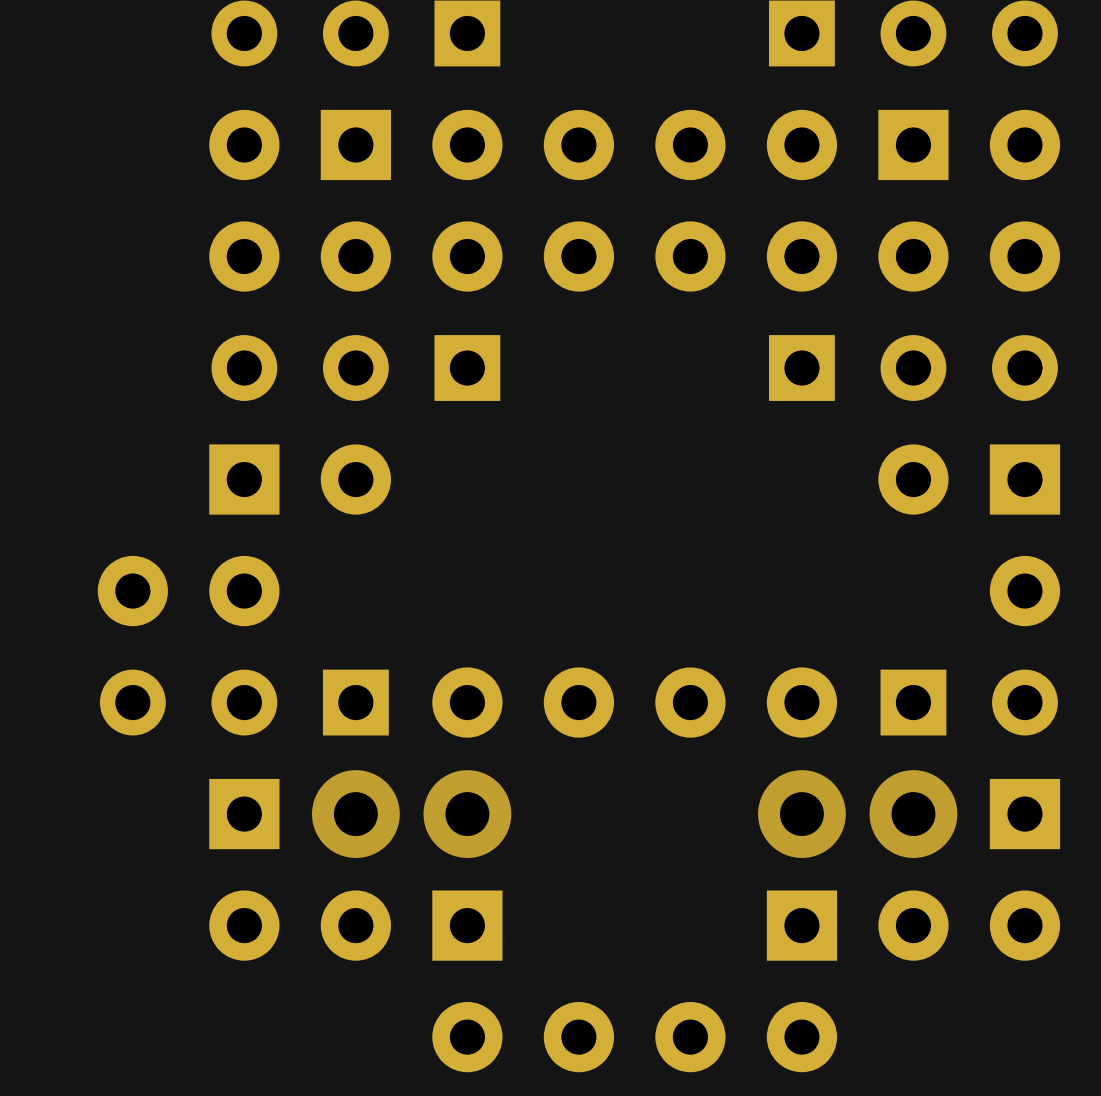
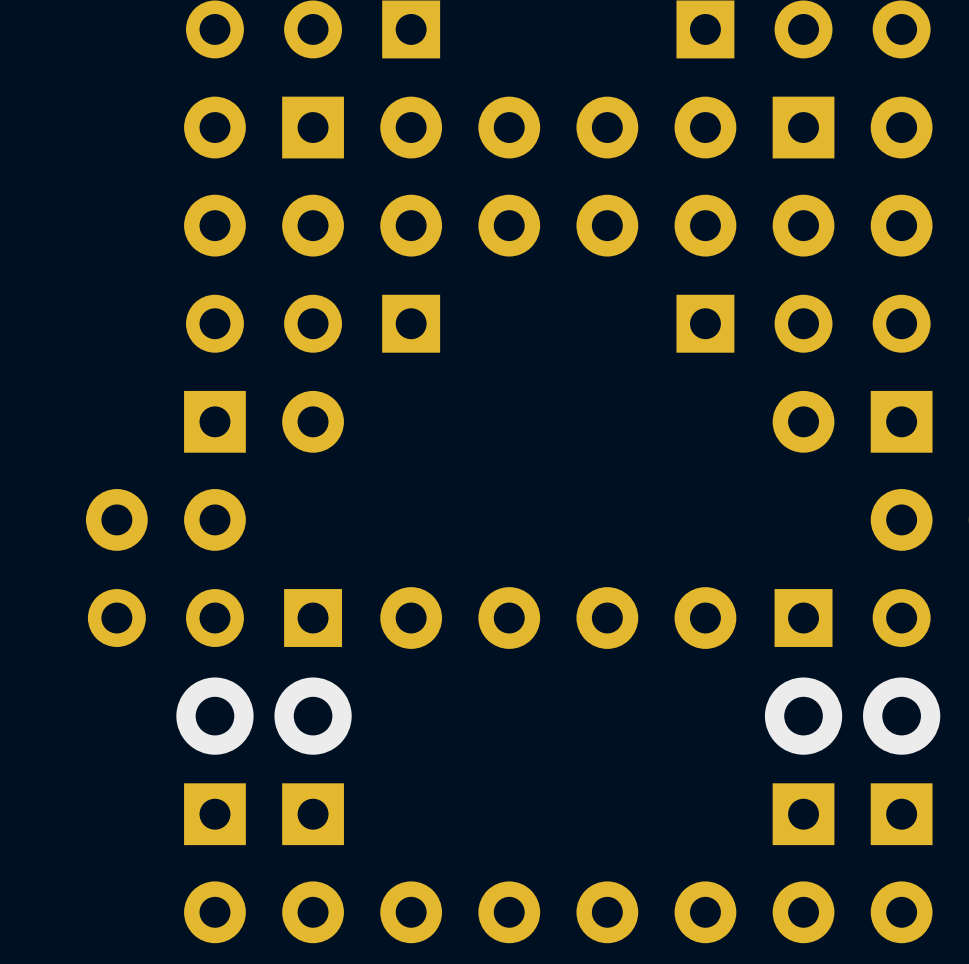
via position: (467, 814) -> (214, 716)
via position: (801, 814) -> (901, 716)
part: (244, 869) -> none
part: (1024, 869) -> none
part: (411, 925) -> none
part: (857, 925) -> none
part: none -> (214, 863)
part: none -> (313, 863)
part: none -> (803, 863)
part: none -> (901, 863)

